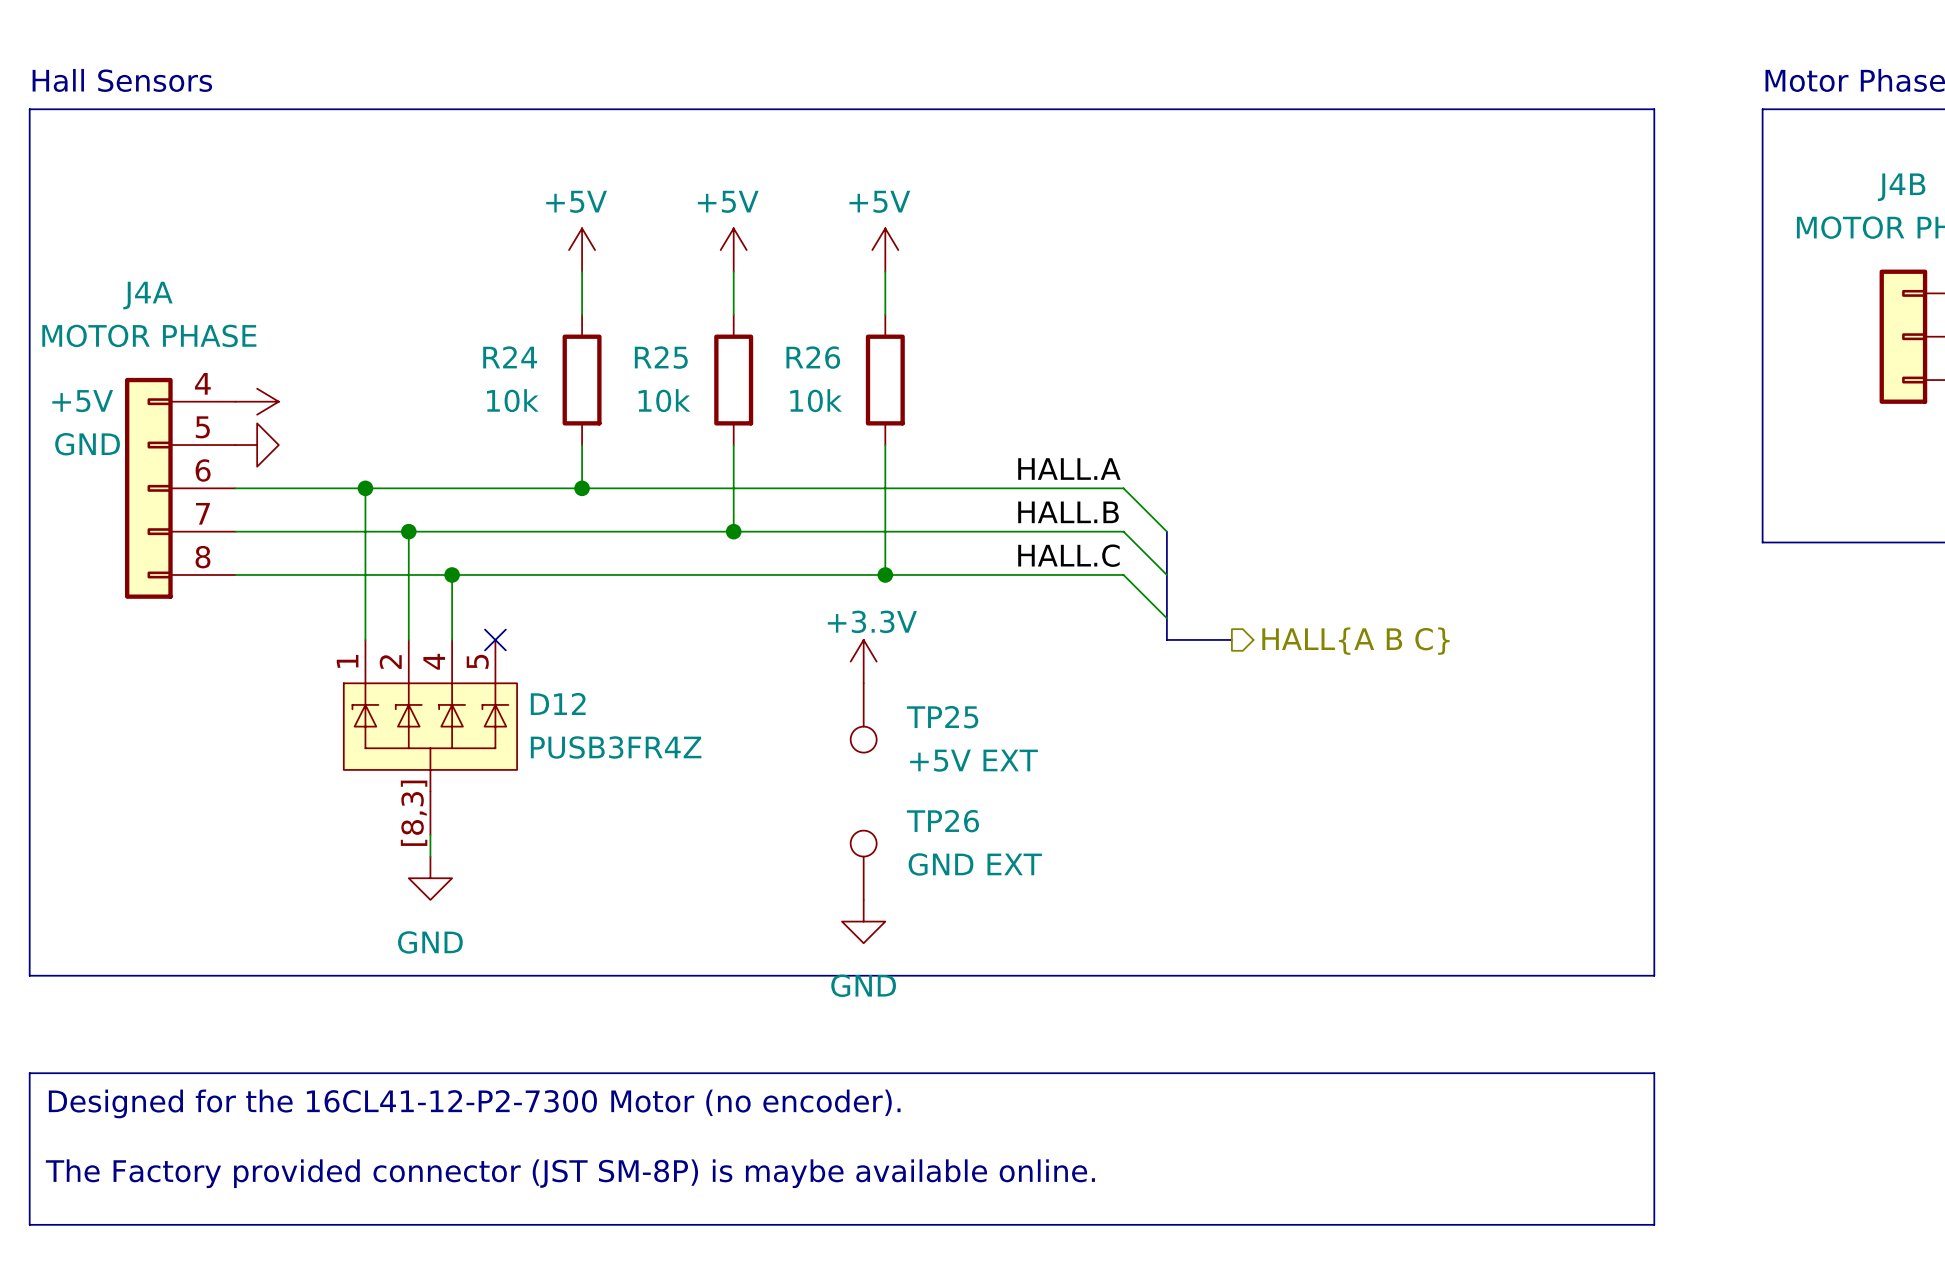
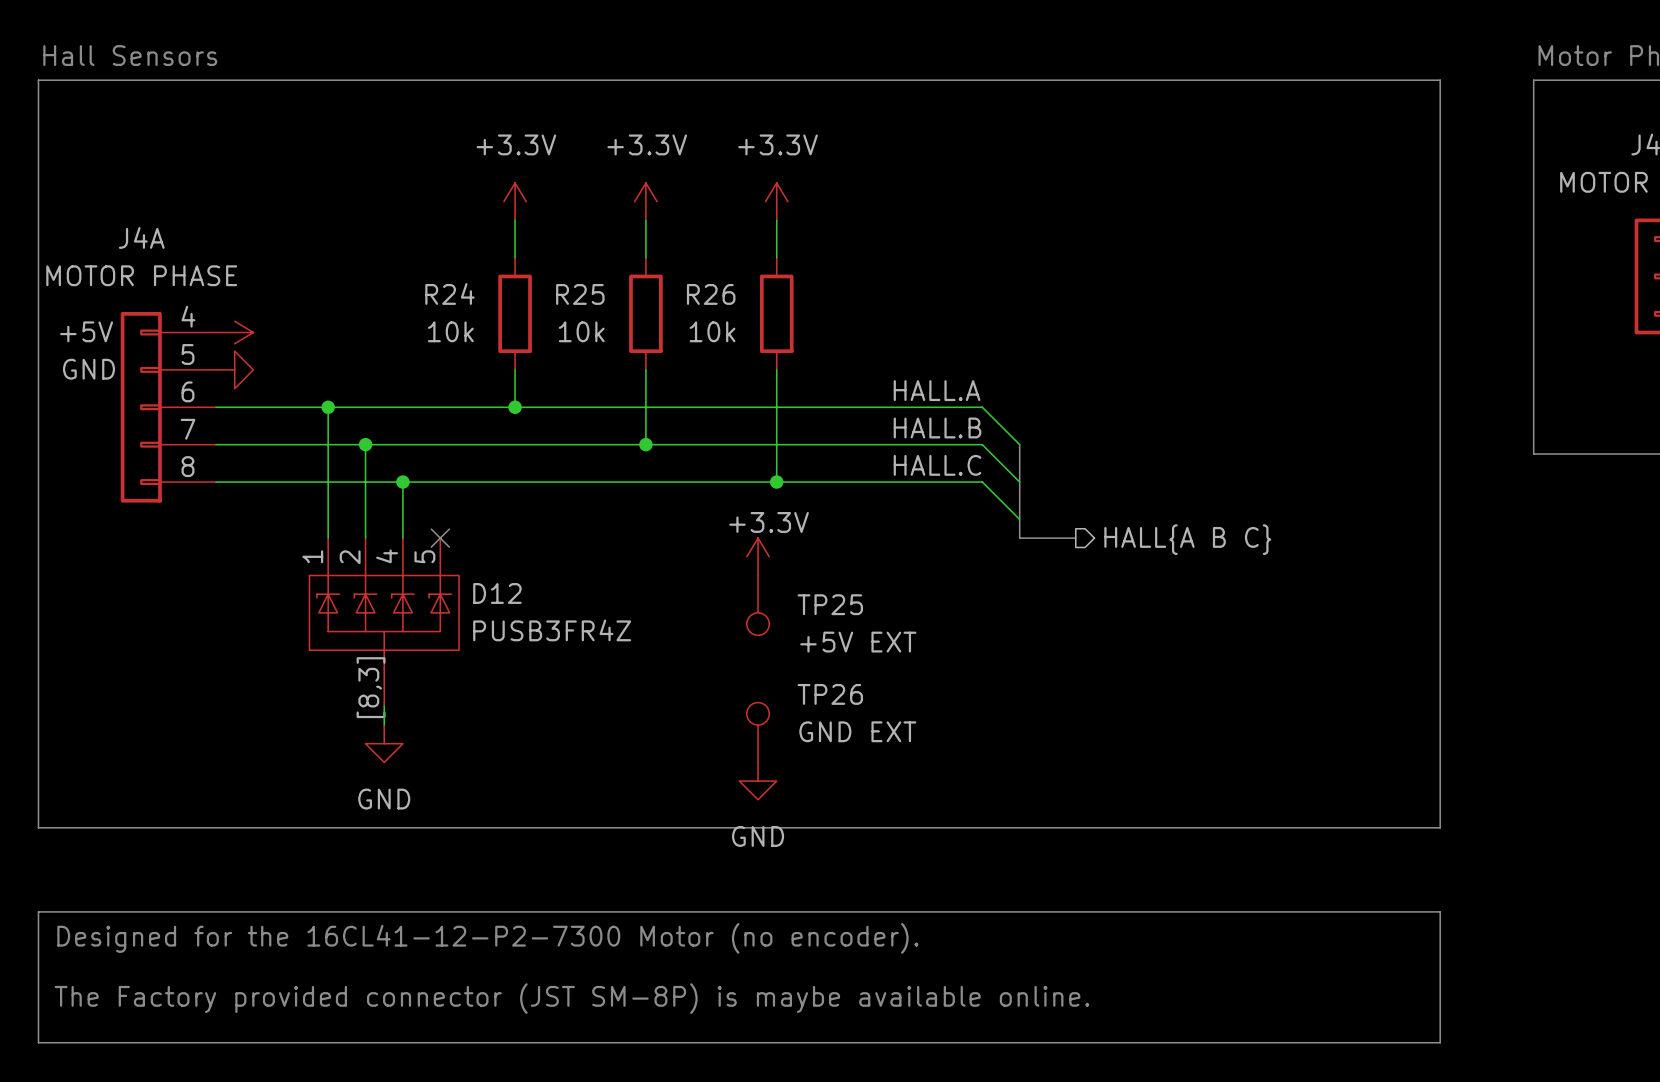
power symbol: +5V (582, 250) -> +3.3V (515, 201)
power symbol: +5V (733, 250) -> +3.3V (645, 201)
power symbol: +5V (885, 250) -> +3.3V (776, 201)

